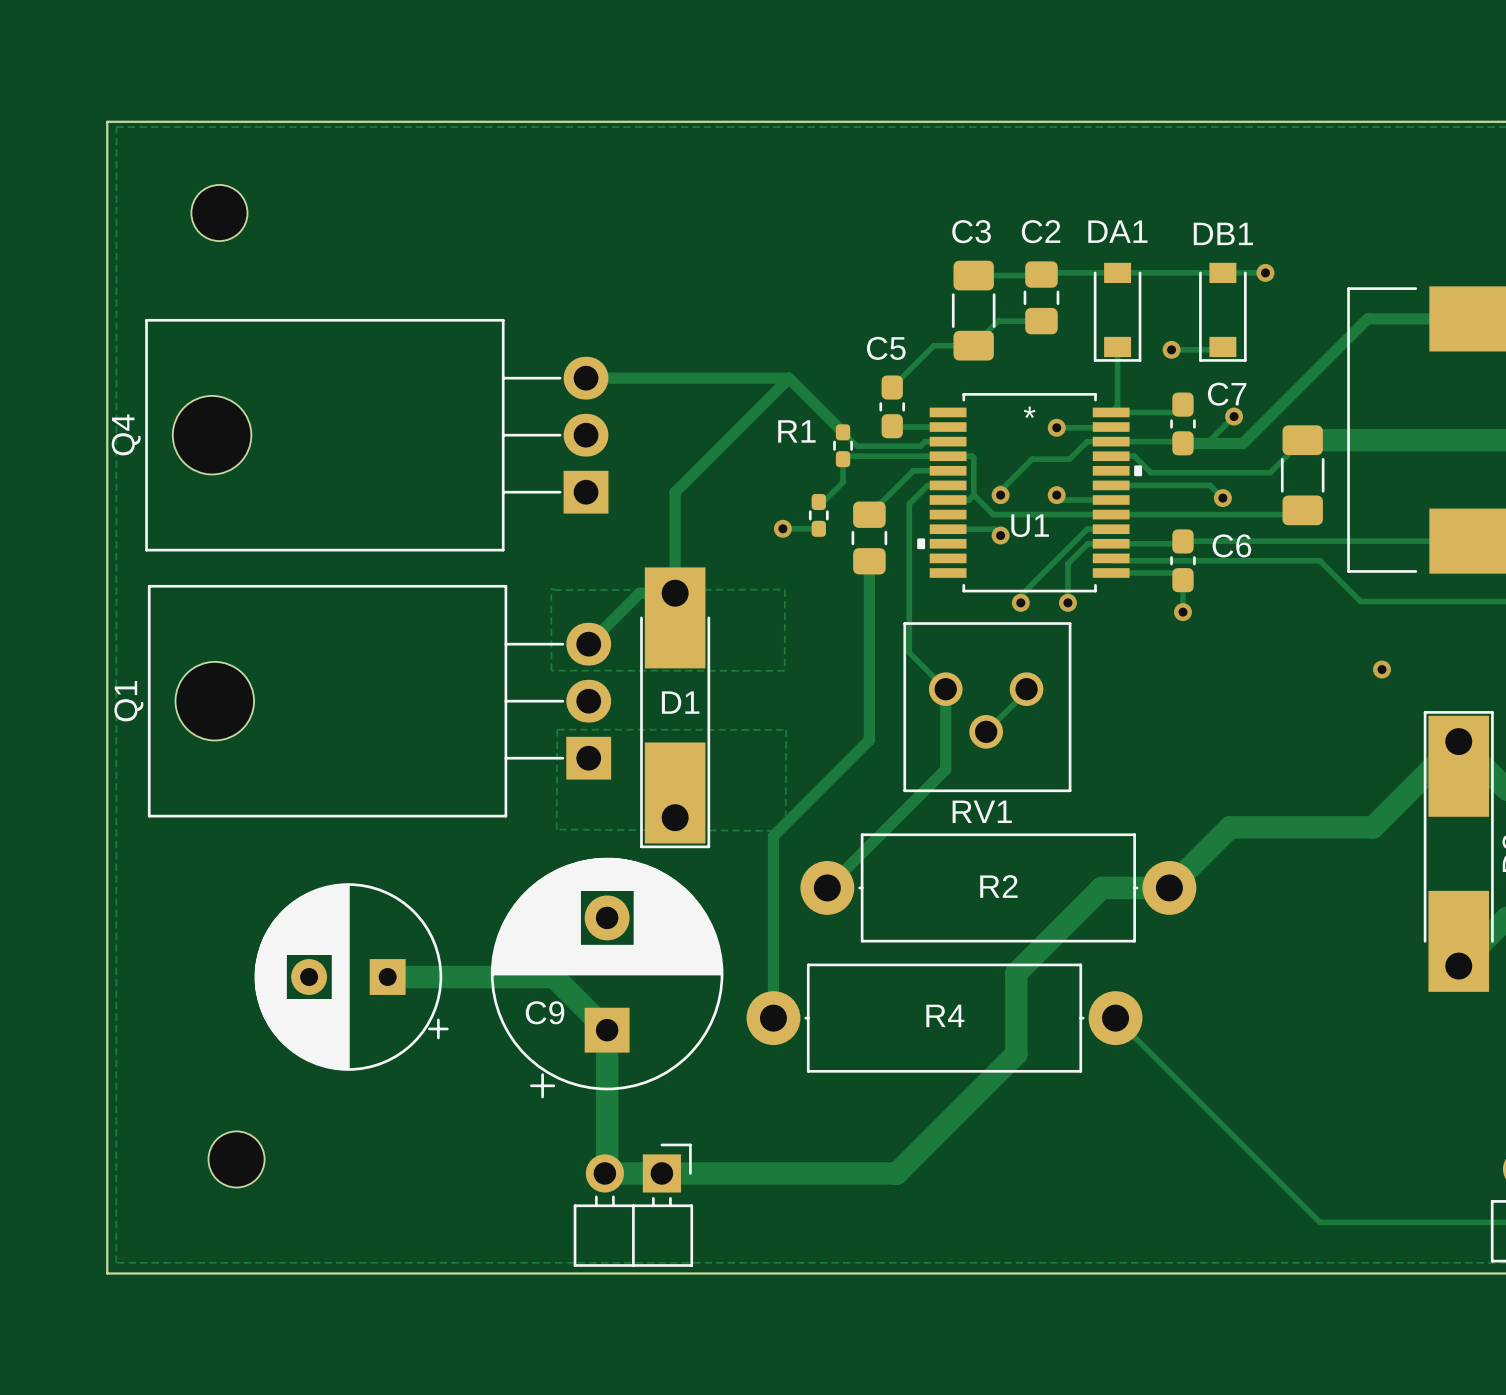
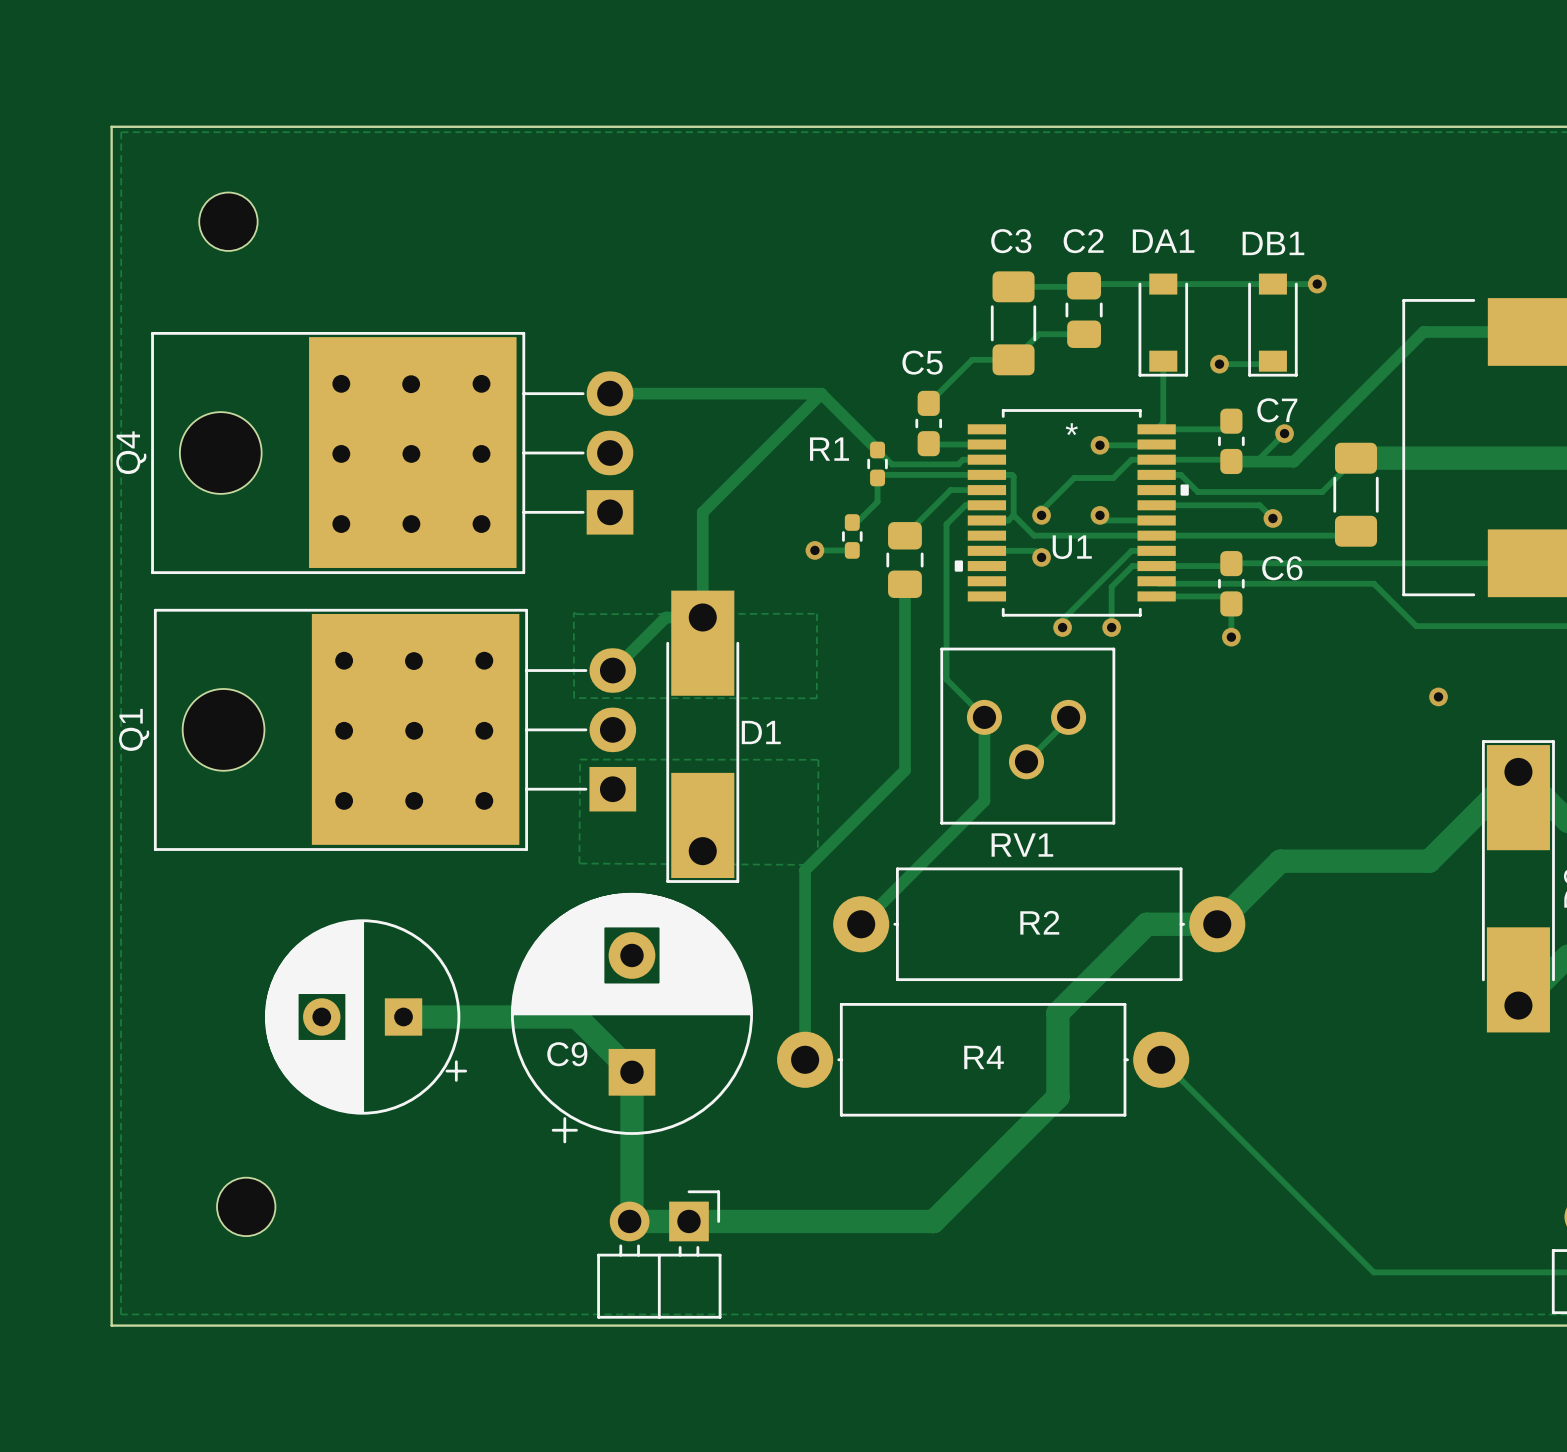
Q4 footprint: [145, 318, 609, 552] -> [151, 331, 634, 575]
Q1 footprint: [147, 584, 612, 818] -> [153, 608, 637, 851]
D1 name position: D1 (680, 702) -> D1 (761, 732)

